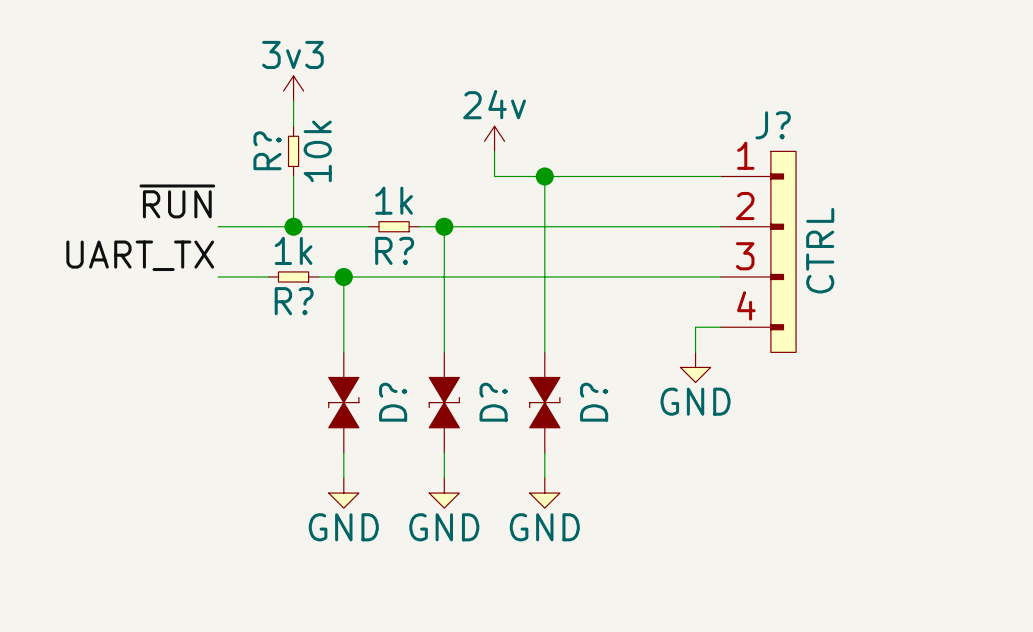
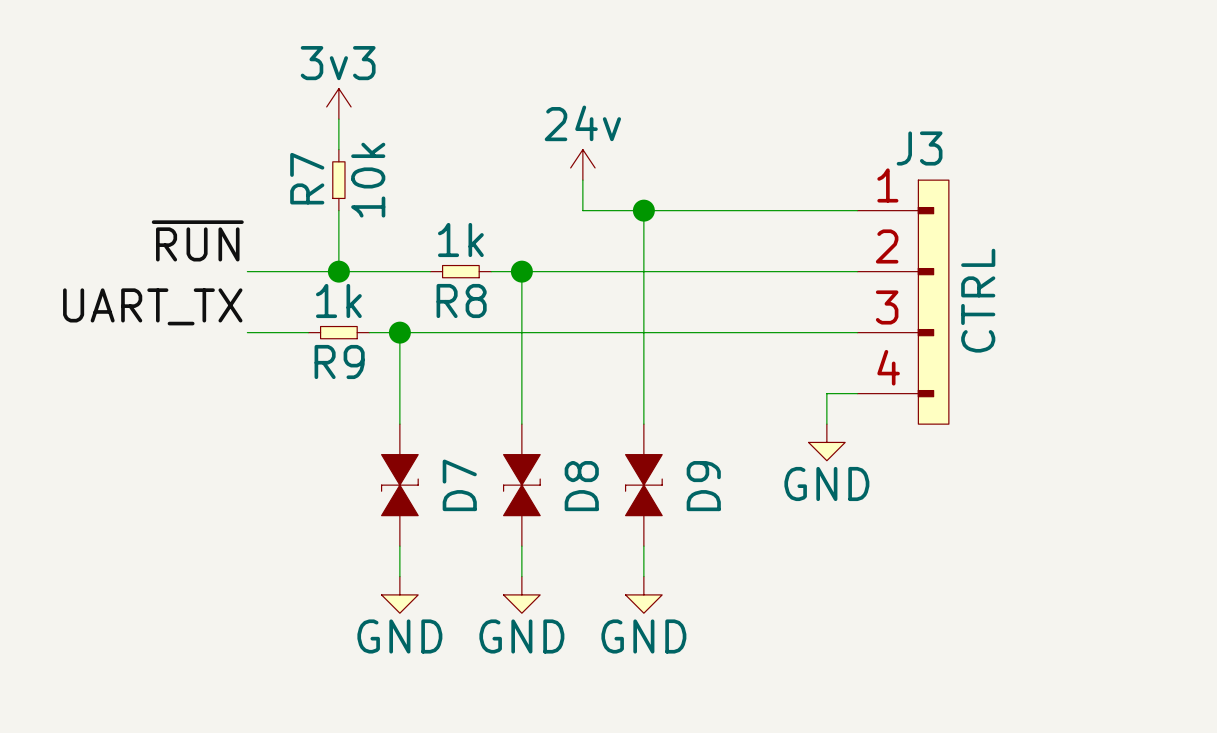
J? name: J? (773, 125) -> J3 (919, 148)
R? name: R? (267, 150) -> R7 (307, 178)
R? name: R? (394, 250) -> R8 (461, 300)
R? name: R? (294, 301) -> R9 (339, 361)
D? name: D? (393, 402) -> D7 (459, 485)
D? name: D? (493, 402) -> D8 (581, 486)
D? name: D? (594, 402) -> D9 (703, 486)

